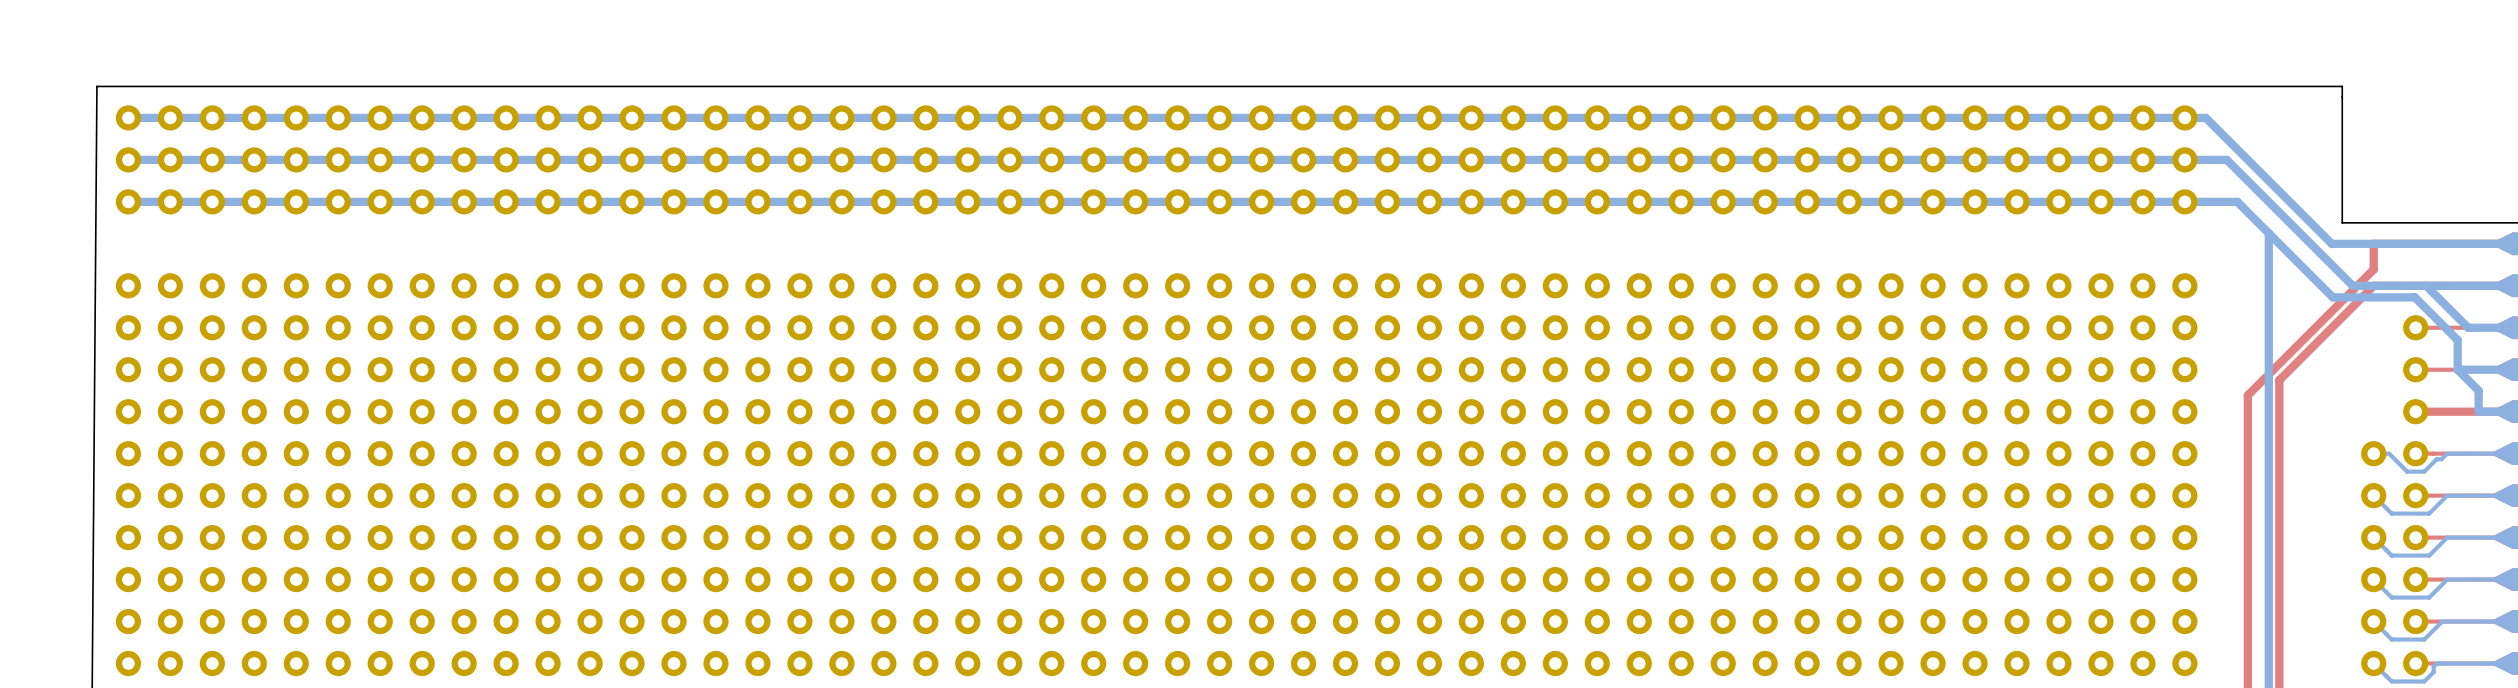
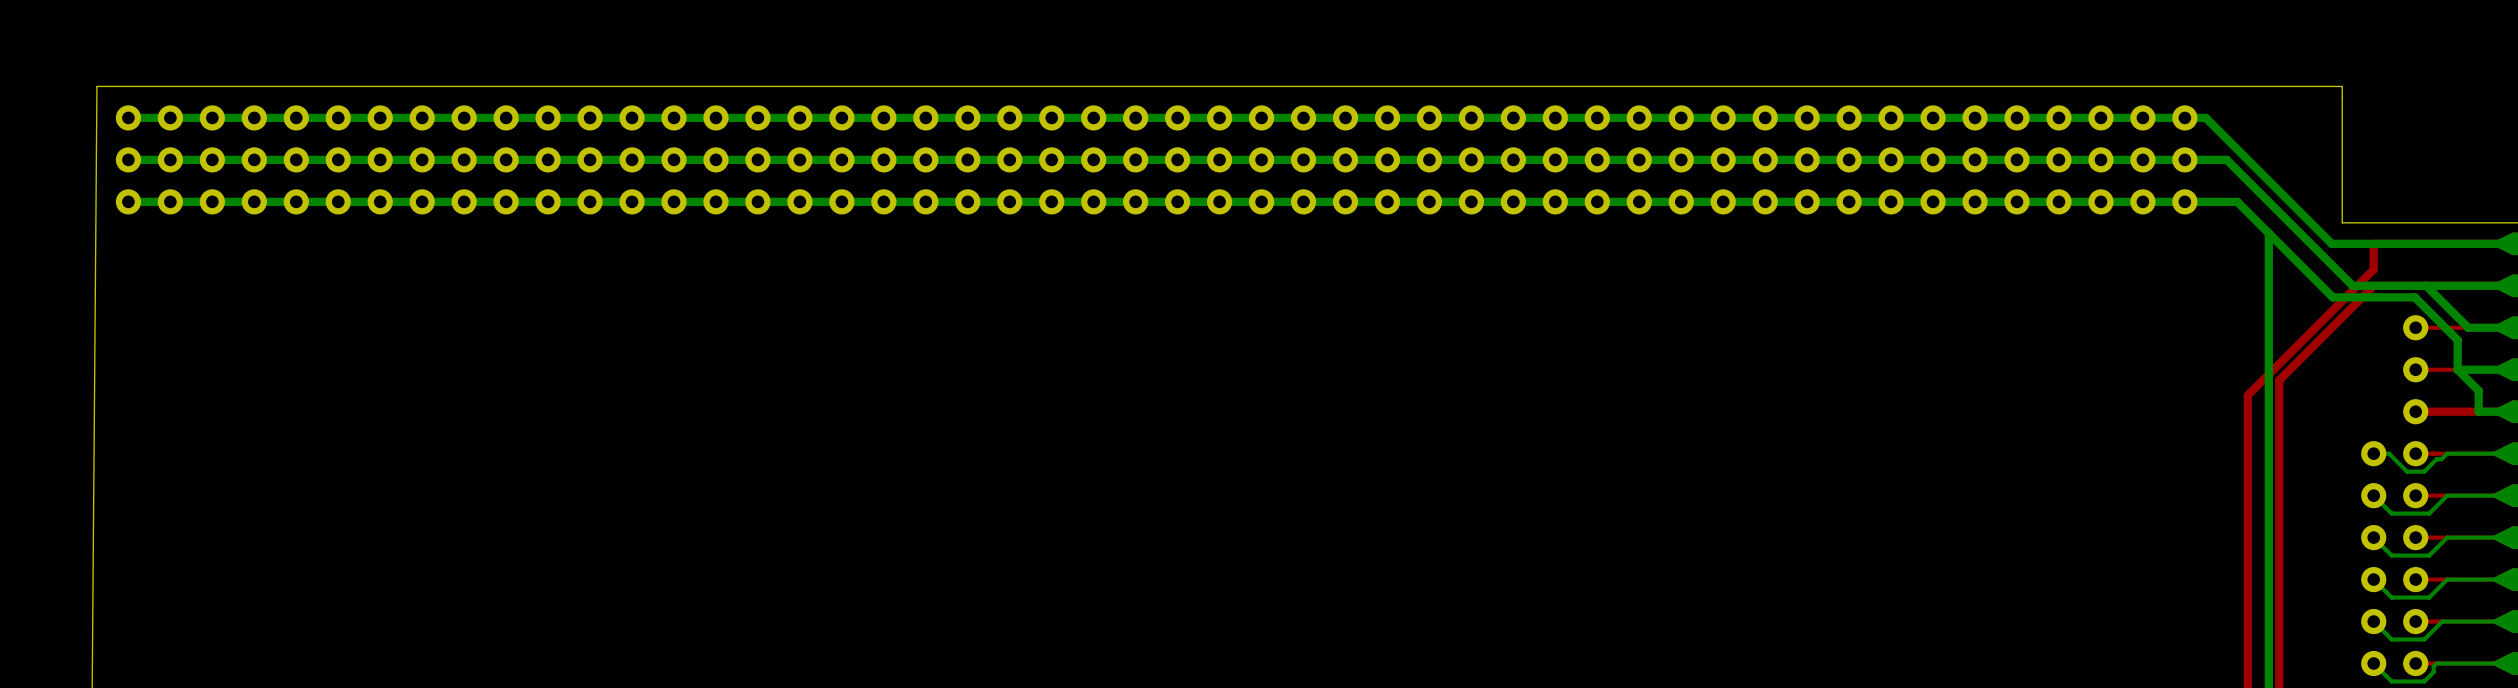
part: (1156, 285) -> none
part: (1156, 327) -> none
part: (1156, 369) -> none
part: (1156, 411) -> none
part: (1156, 453) -> none
part: (1156, 495) -> none
part: (1156, 537) -> none
part: (1156, 579) -> none
part: (1156, 621) -> none
part: (1156, 663) -> none

